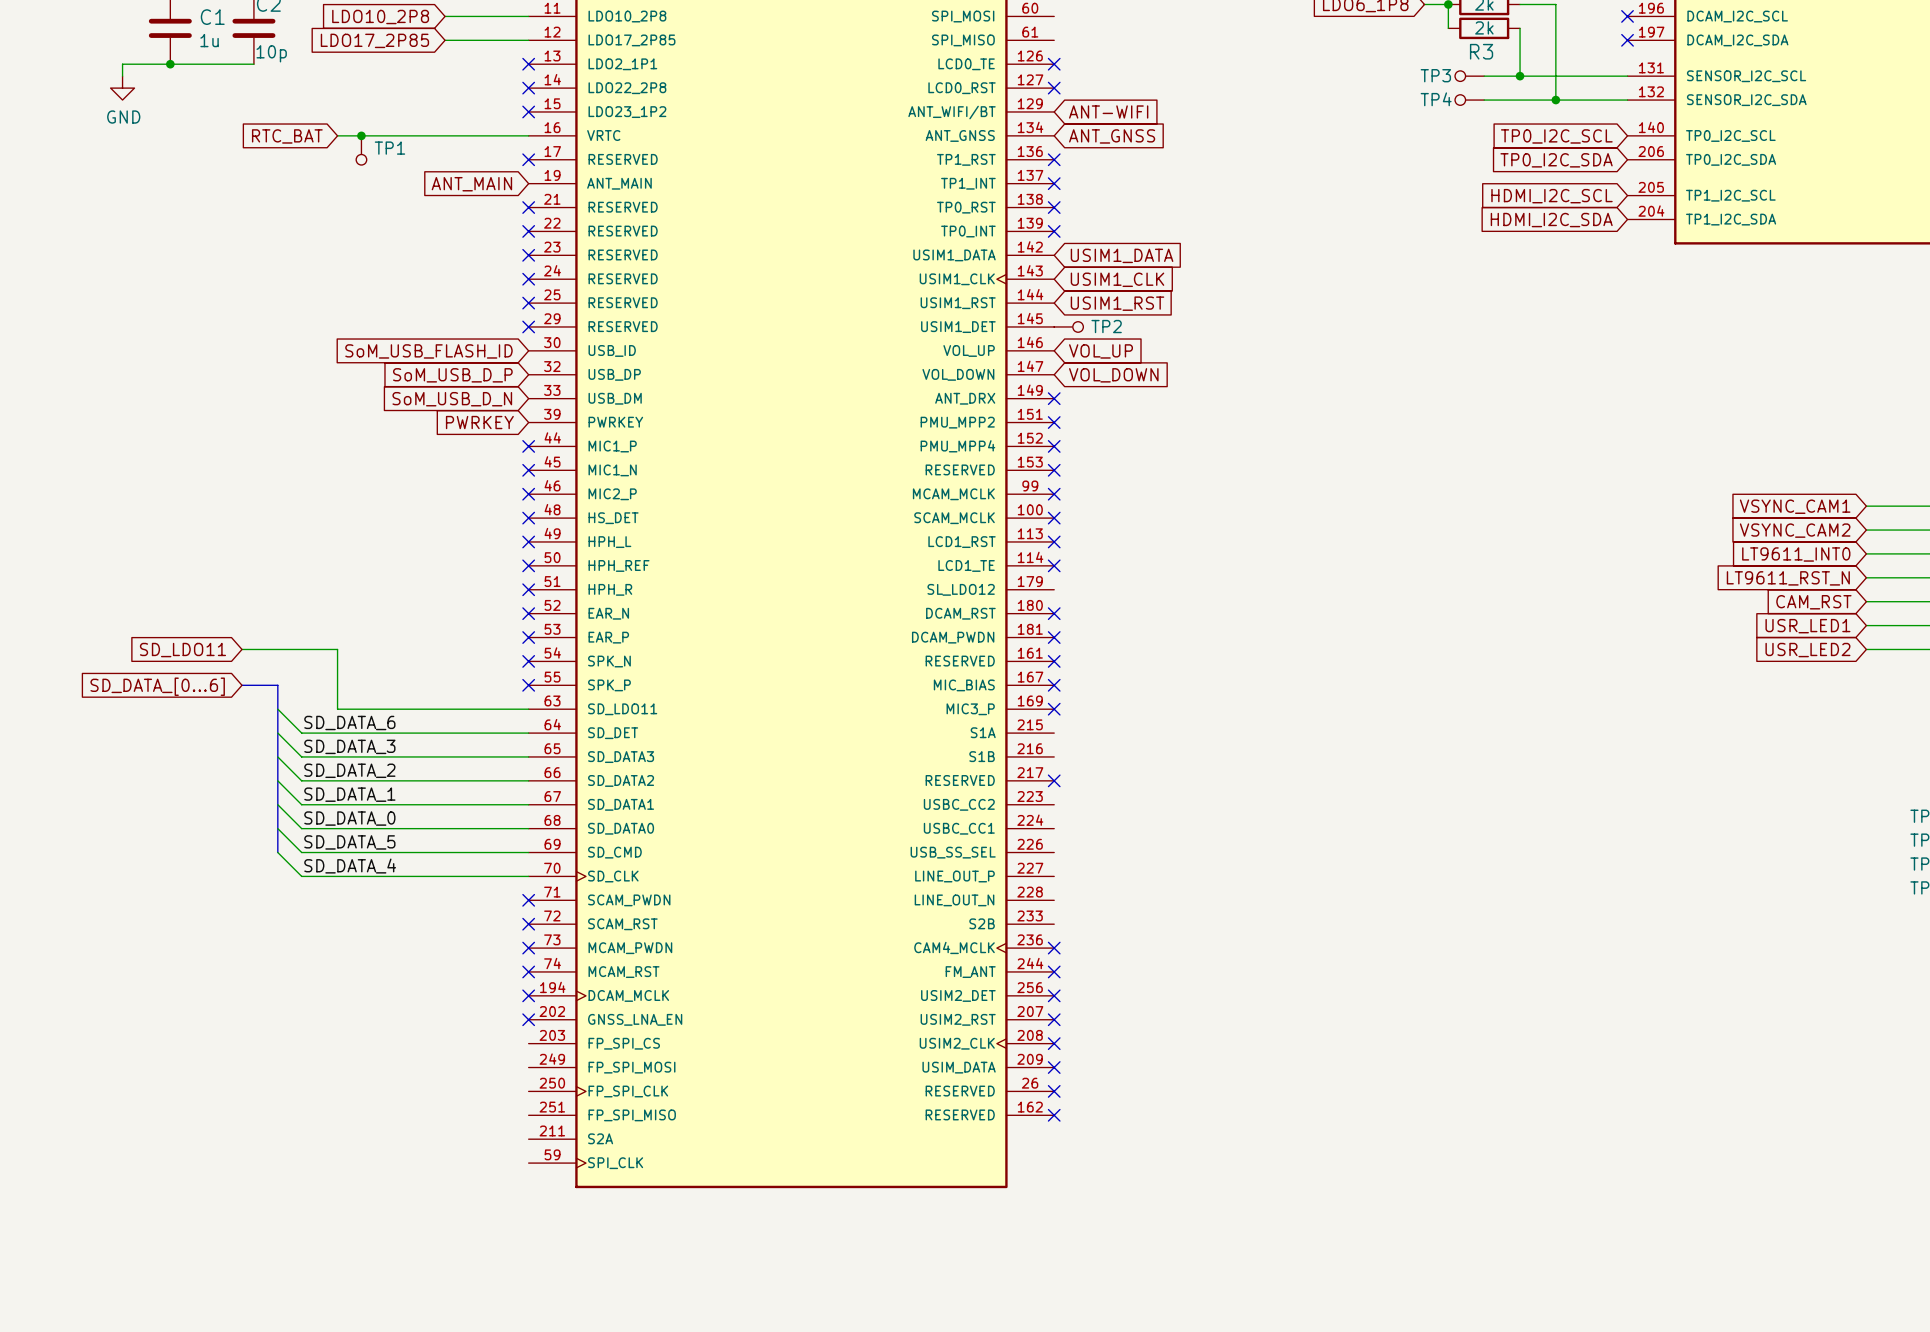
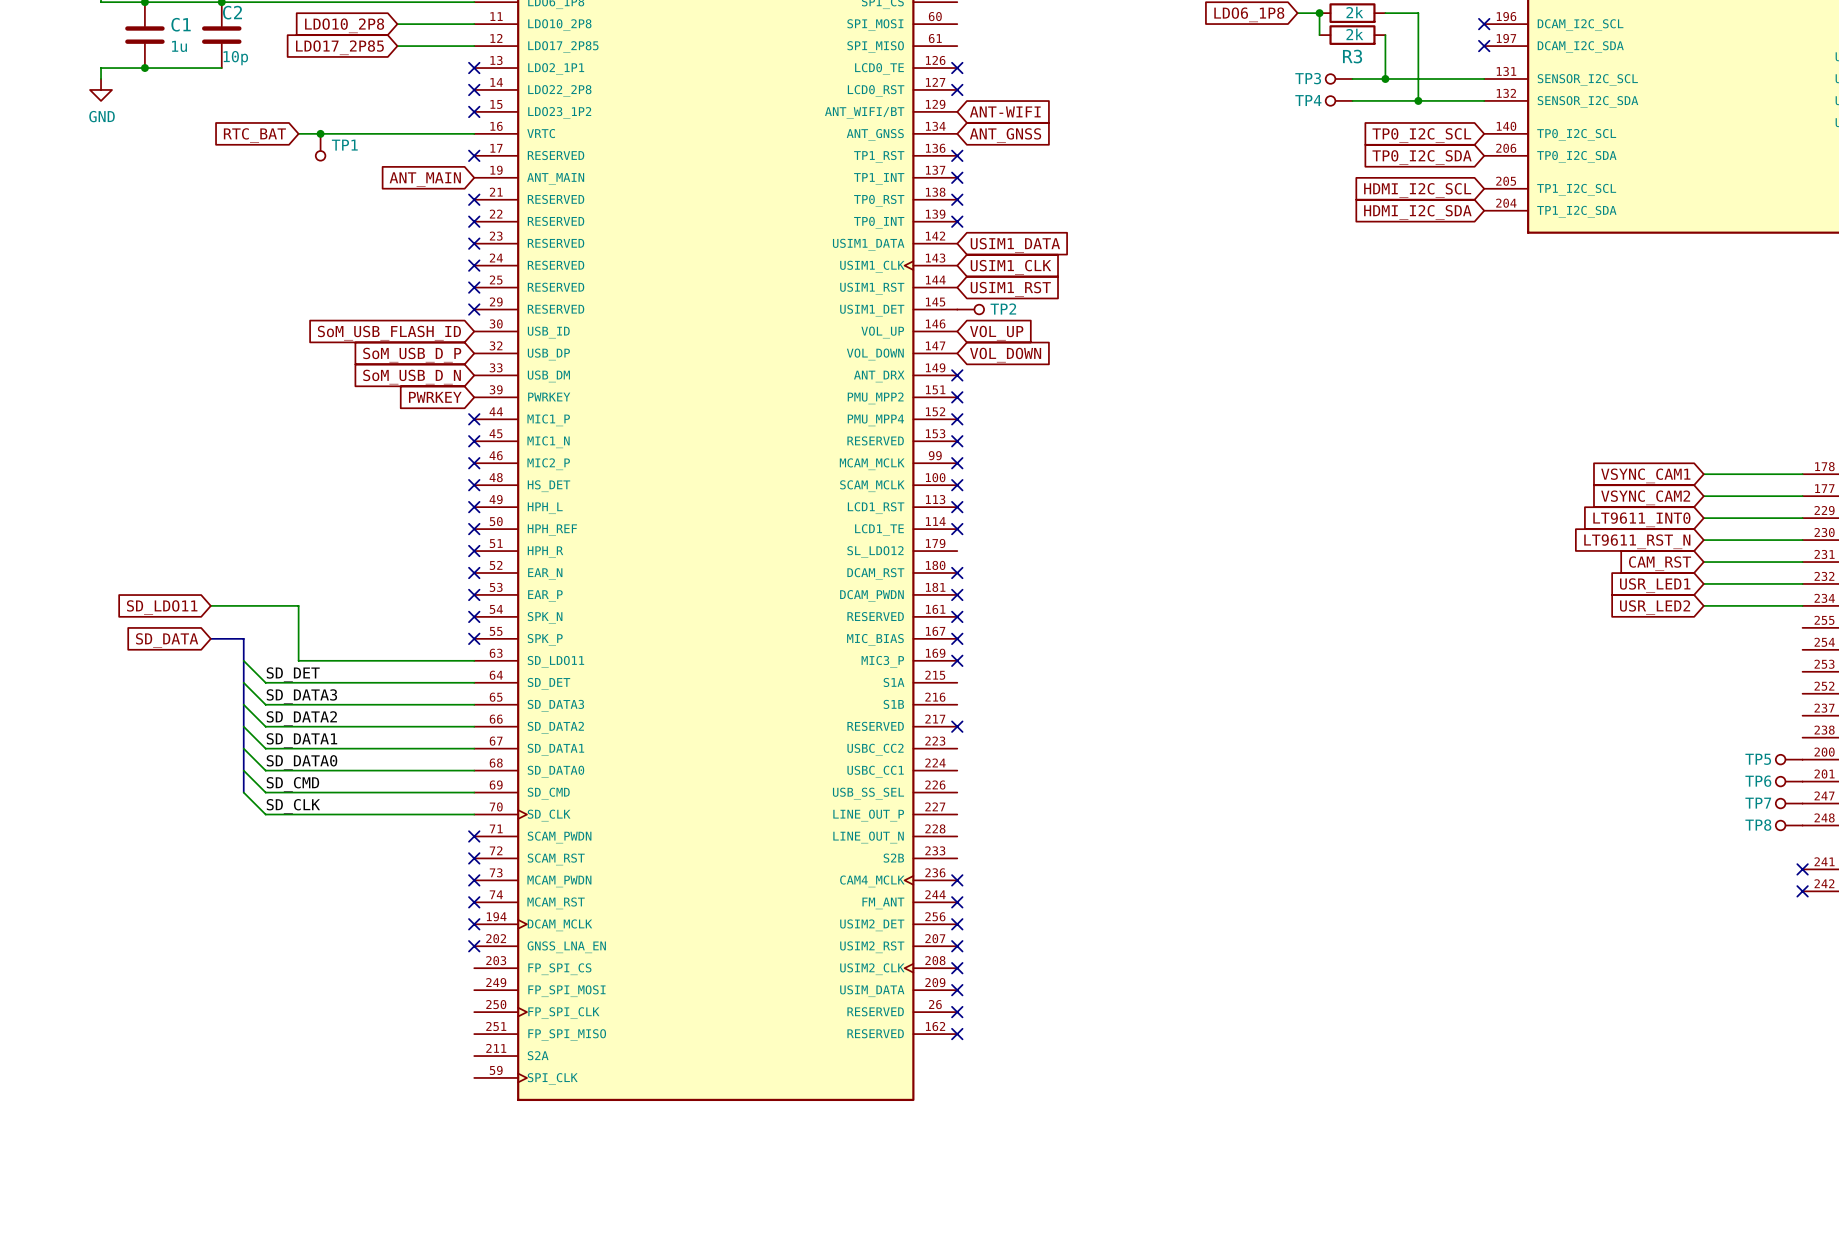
global label: SD_DATA_[0...6] (157, 686) -> SD_DATA (167, 640)
label: SD_DATA_6 (349, 722) -> SD_DET (293, 674)
label: SD_DATA_3 (349, 746) -> SD_DATA3 (301, 696)
label: SD_DATA_2 (349, 770) -> SD_DATA2 (301, 718)
label: SD_DATA_1 (349, 794) -> SD_DATA1 (301, 740)
label: SD_DATA_0 (349, 818) -> SD_DATA0 (301, 762)
label: SD_DATA_5 (349, 842) -> SD_CMD (292, 784)
label: SD_DATA_4 (350, 866) -> SD_CLK (293, 806)

